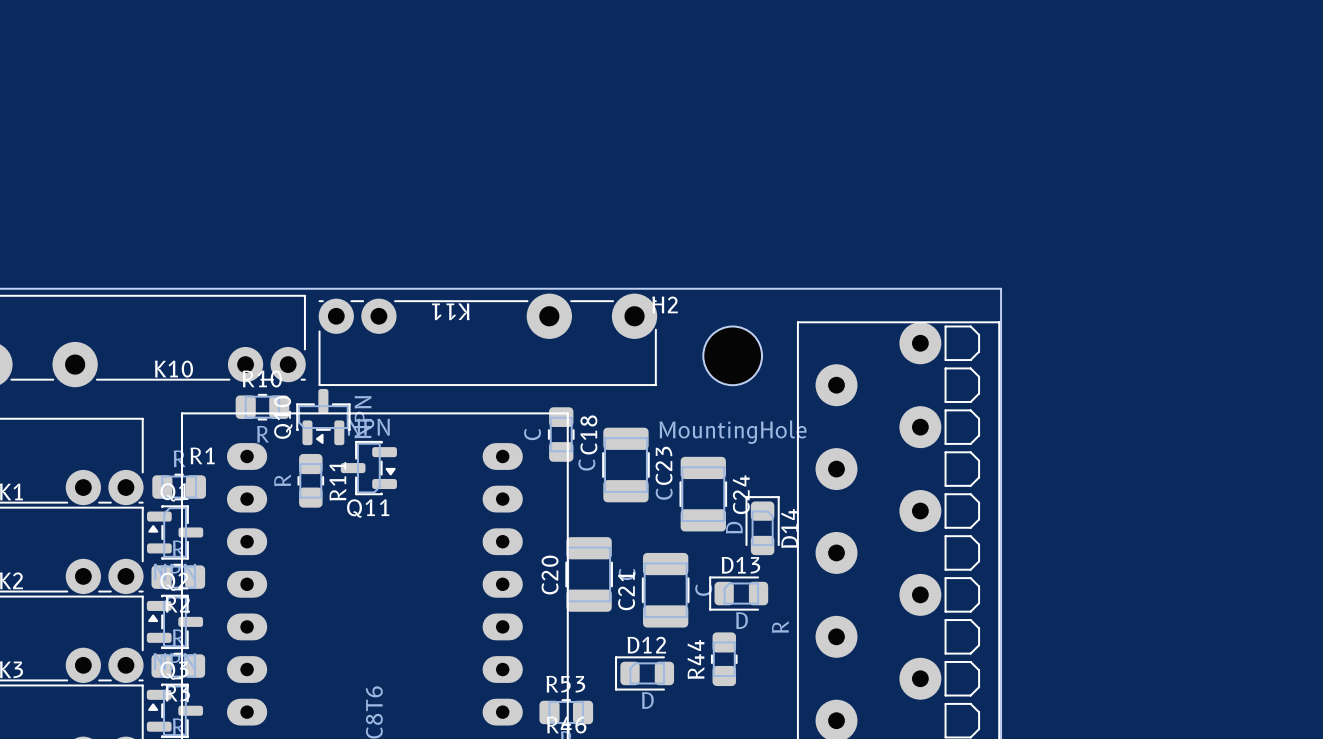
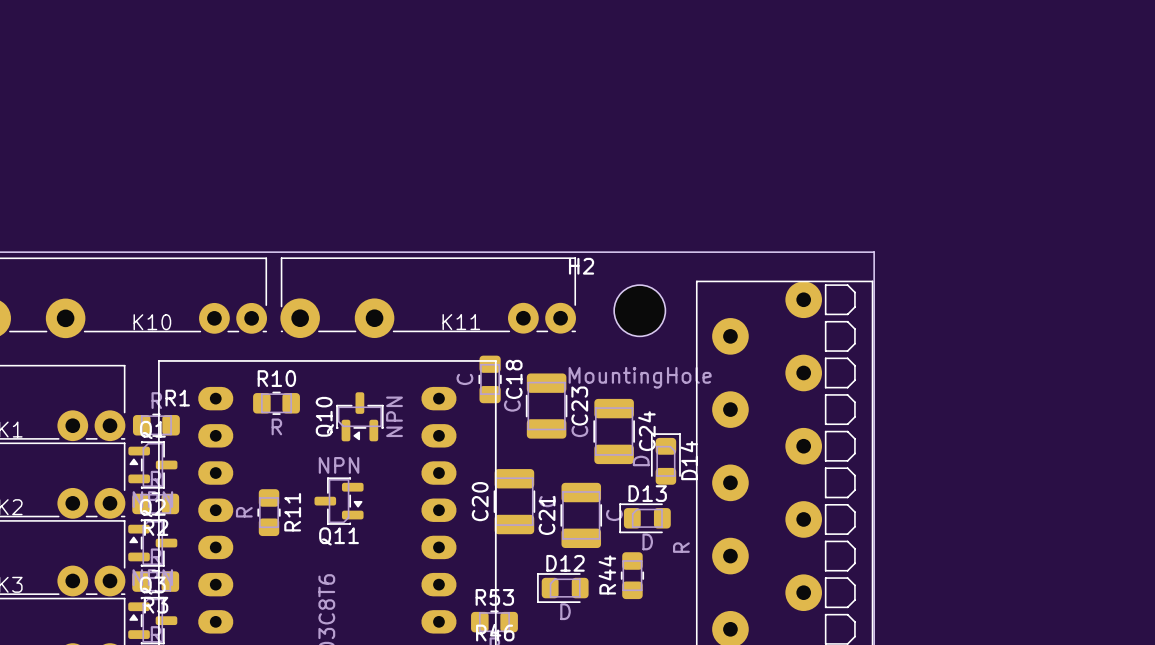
K11 rotation: 0° (487, 339) -> 180° (428, 297)
R10 position: (262, 407) -> (276, 403)
Q10 position: (323, 417) -> (359, 416)
Q11 position: (368, 468) -> (339, 501)
R11 position: (310, 480) -> (269, 512)

